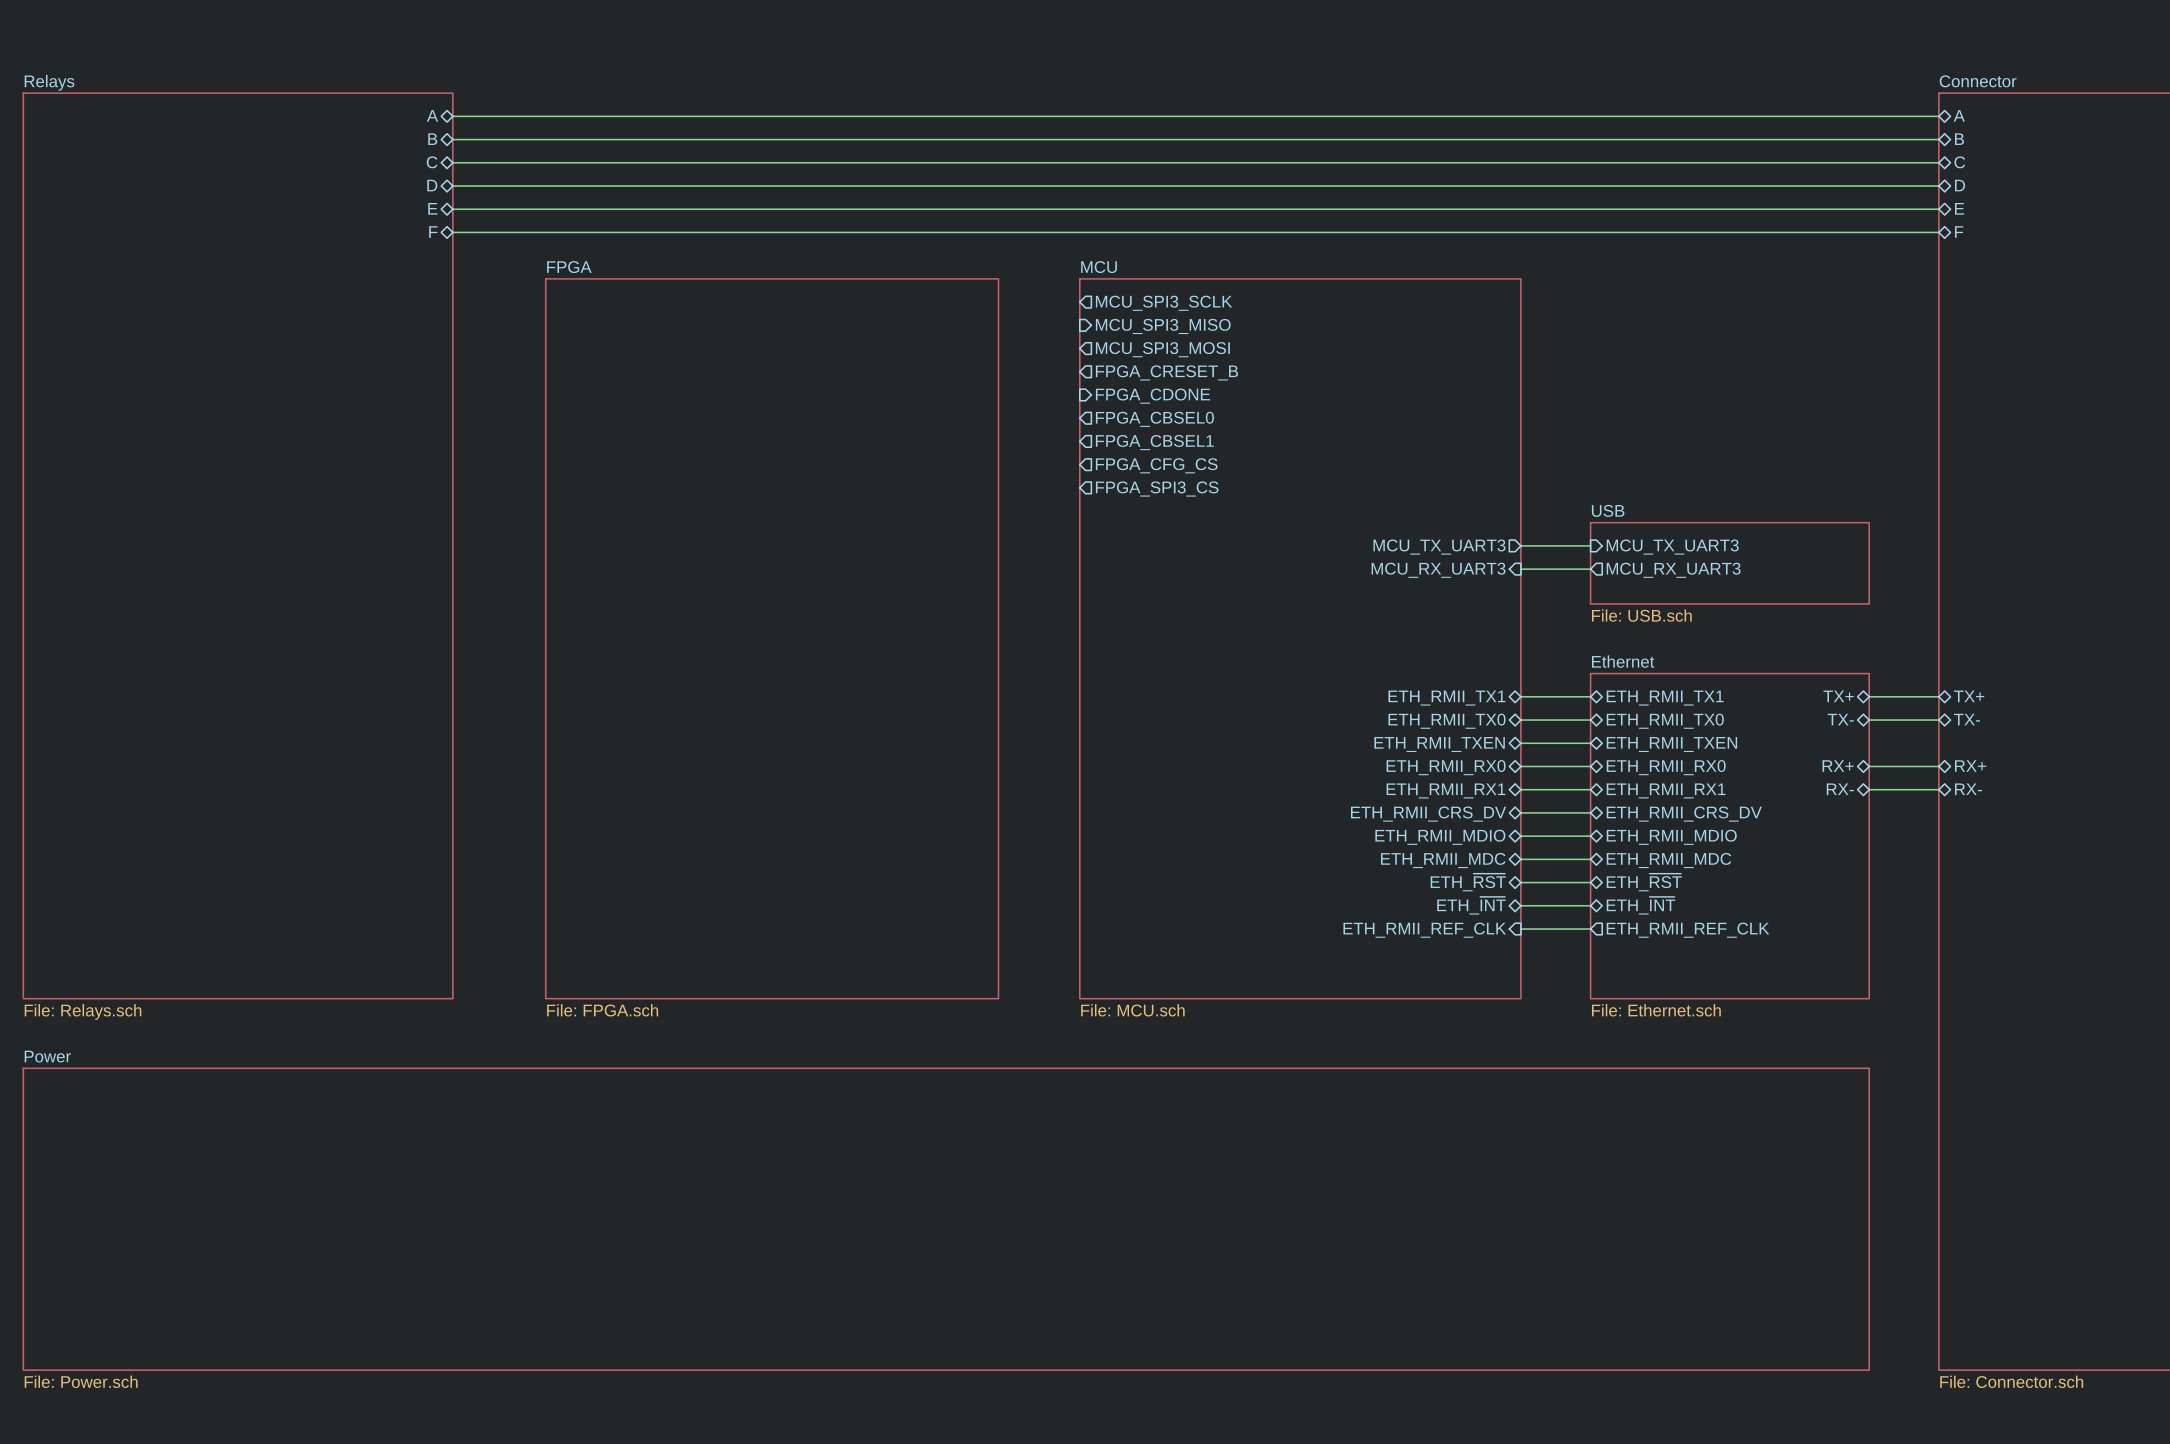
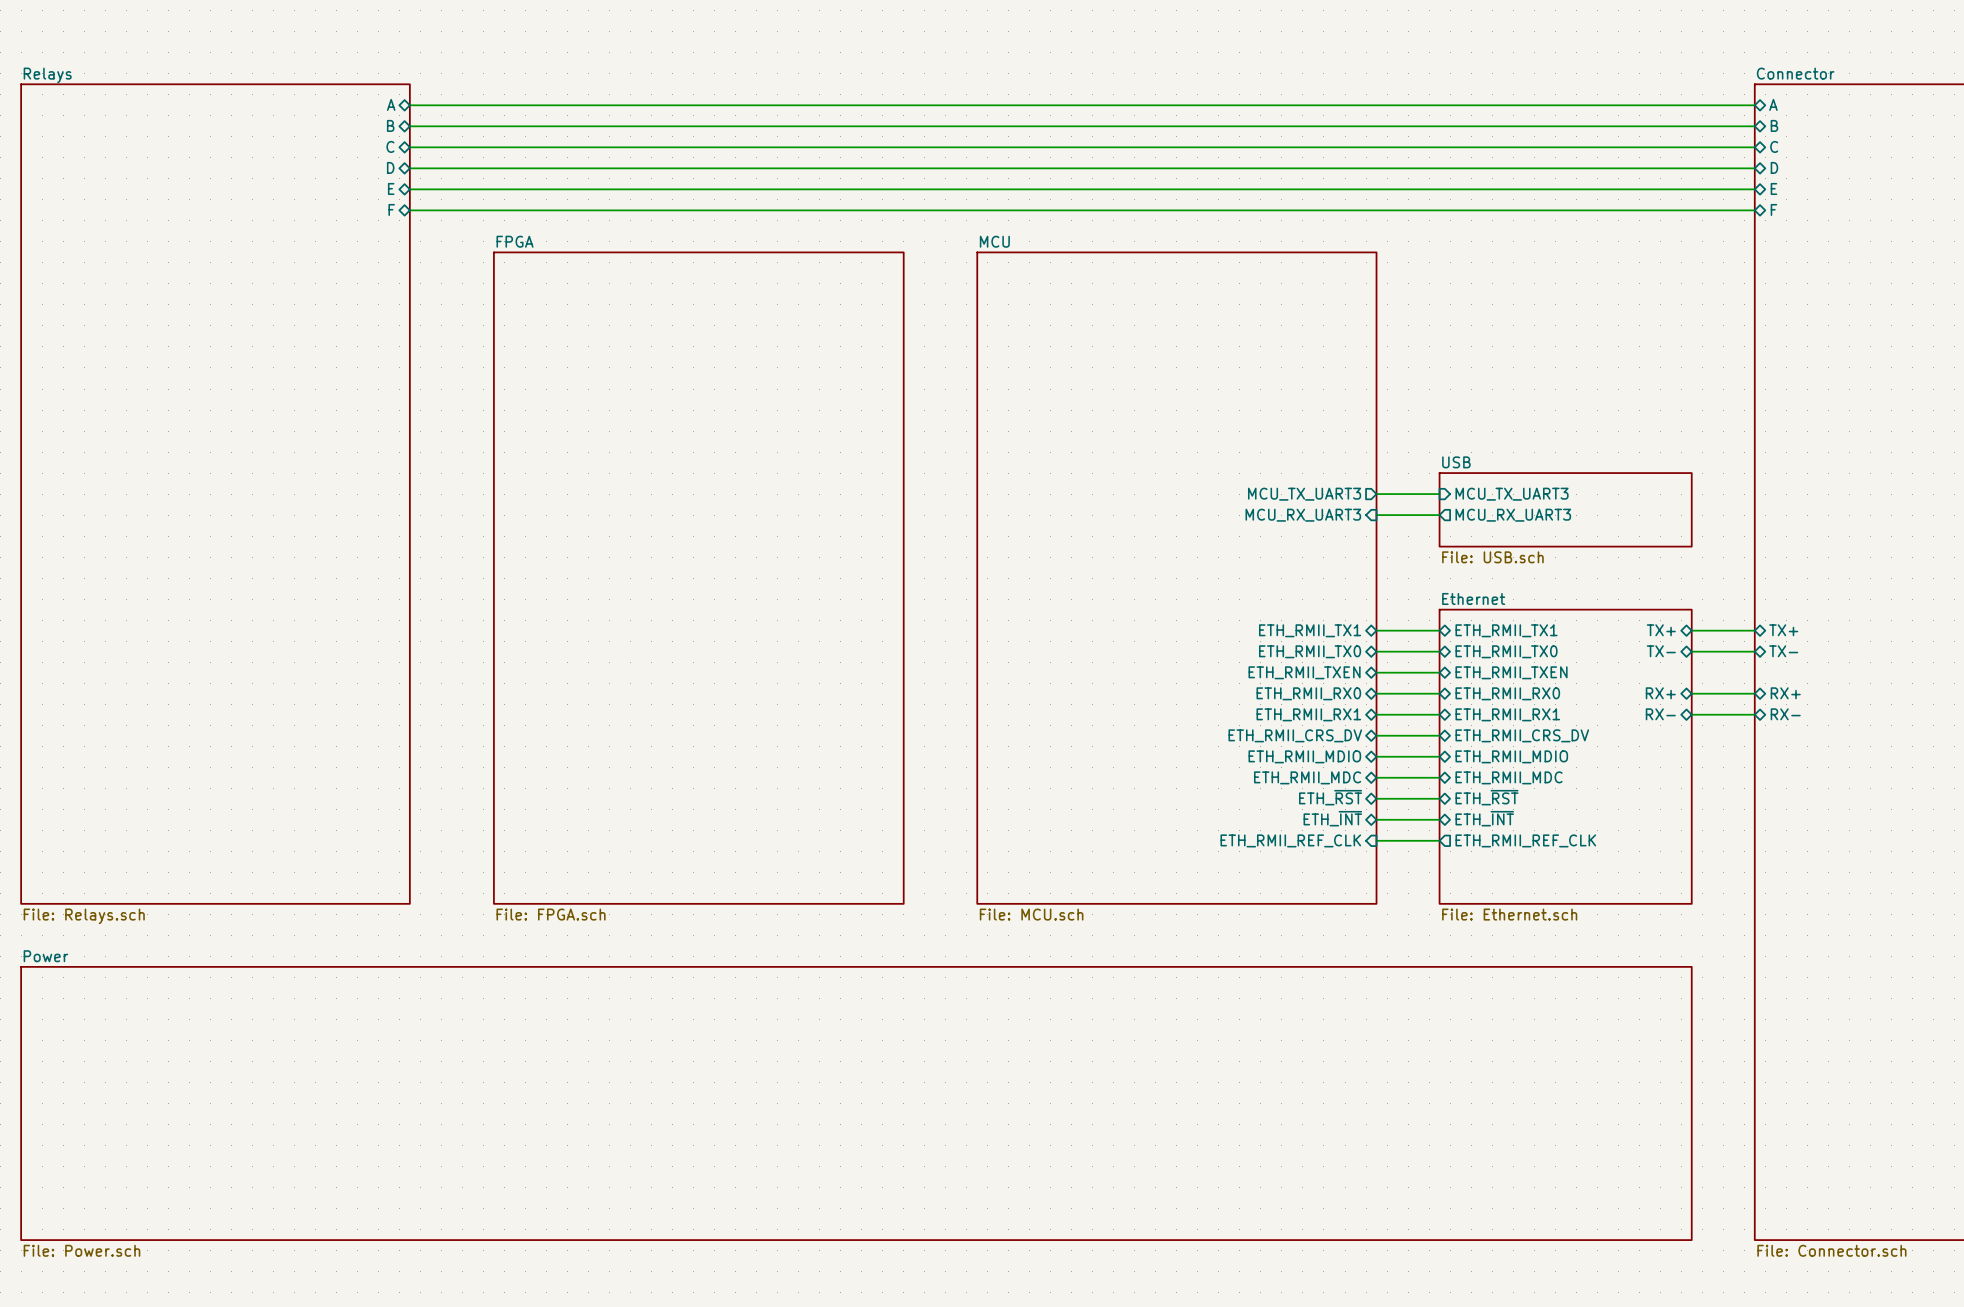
sheet pin: MCU_SPI3_SCLK (1164, 303) -> none
sheet pin: MCU_SPI3_MISO (1163, 326) -> none
sheet pin: MCU_SPI3_MOSI (1162, 349) -> none
sheet pin: FPGA_CRESET_B (1166, 372) -> none
sheet pin: FPGA_CDONE (1152, 396) -> none
sheet pin: FPGA_CBSEL0 (1154, 419) -> none
sheet pin: FPGA_CBSEL1 (1154, 442) -> none
sheet pin: FPGA_CFG_CS (1156, 465) -> none
sheet pin: FPGA_SPI3_CS (1157, 489) -> none

